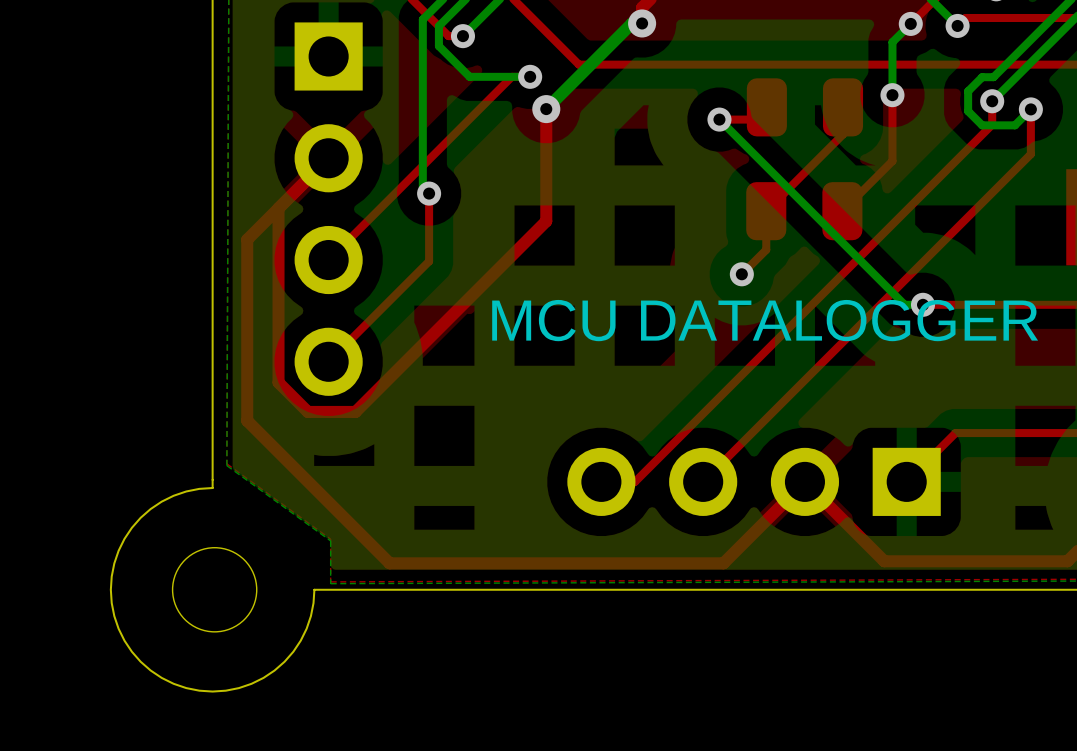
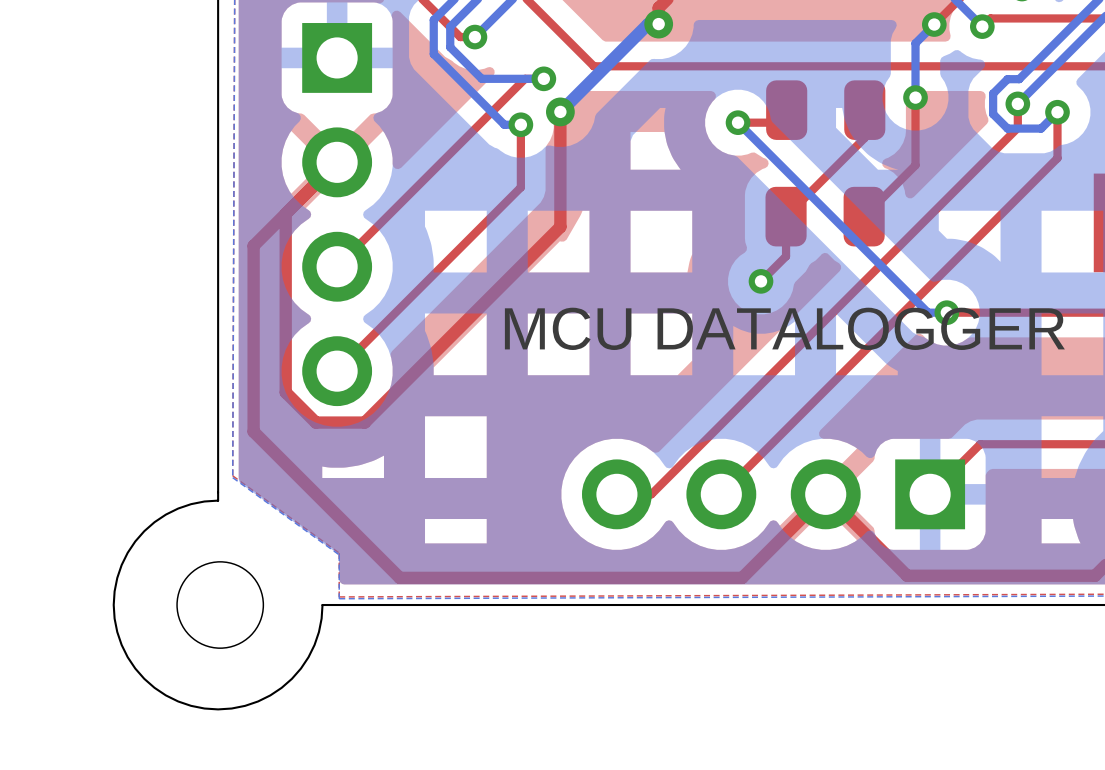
bottom track: (422, 52) (422, 187) (429, 193) -> (433, 54) (504, 124) (520, 124)
top track: (429, 193) (429, 261) -> (520, 124) (520, 187) (440, 268)
via position: (429, 193) -> (520, 124)

